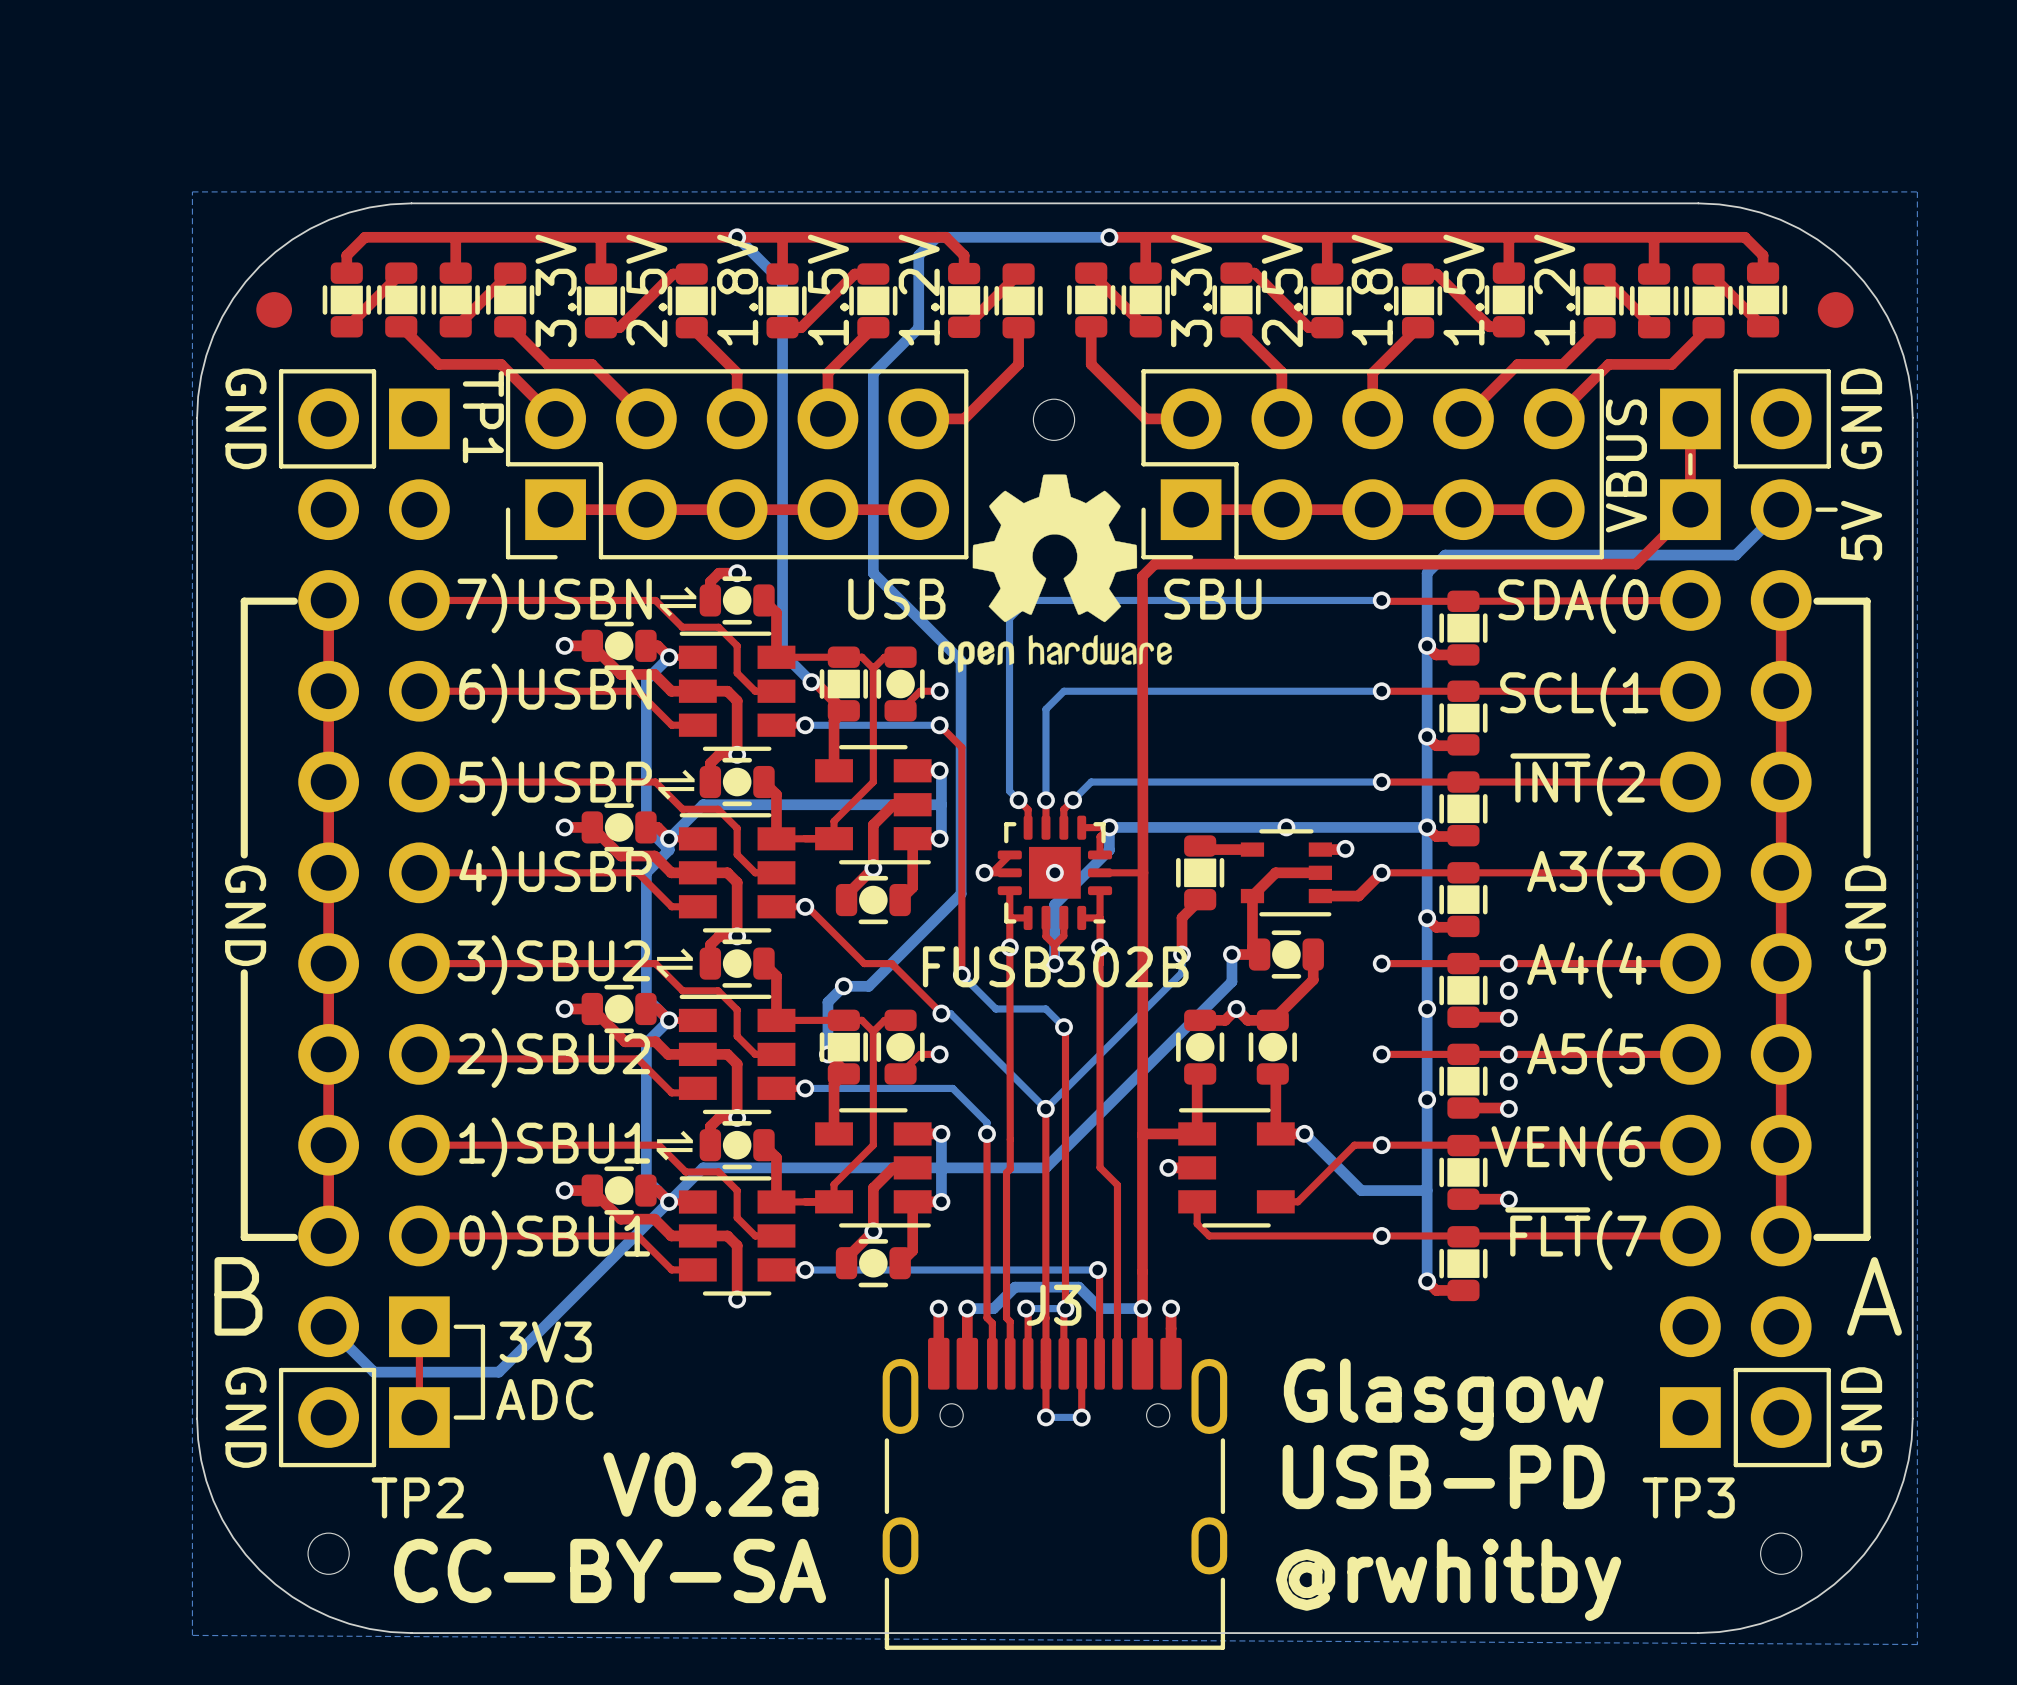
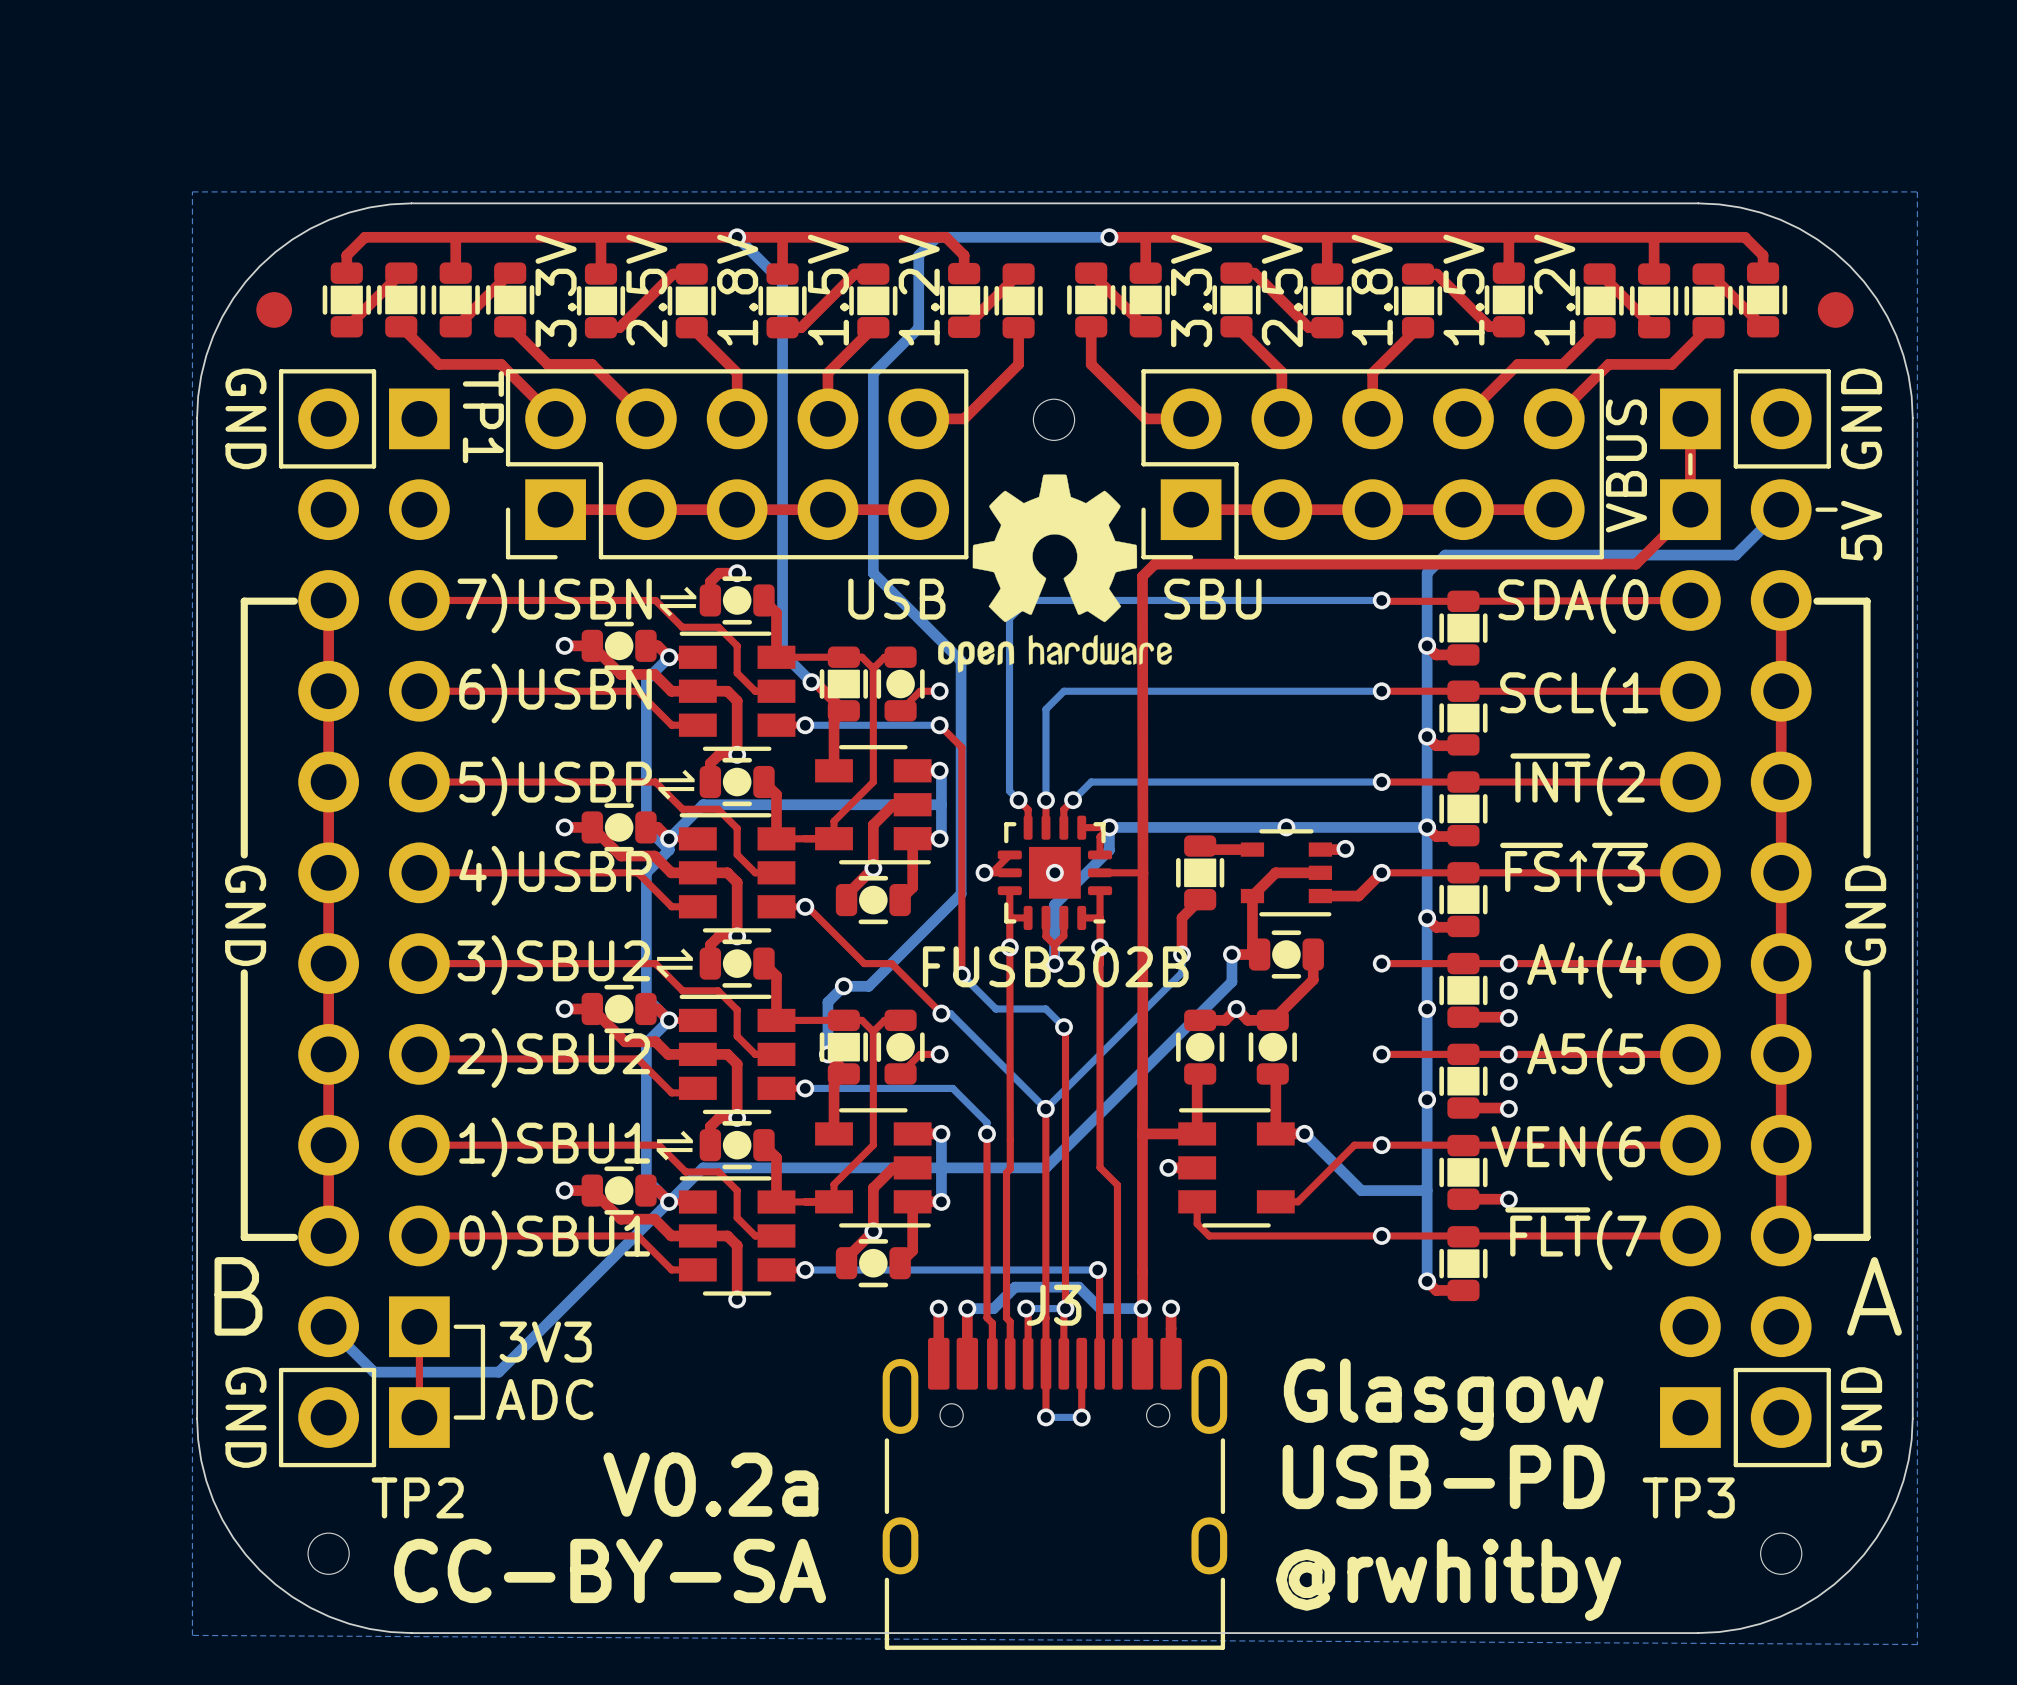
line: none -> (1578, 852) (1585, 860)
line: none -> (1578, 852) (1571, 860)
line: none -> (1578, 852) (1578, 890)
text: A3(3 (1586, 875) -> ~{FS} ~{(3} (1574, 874)

